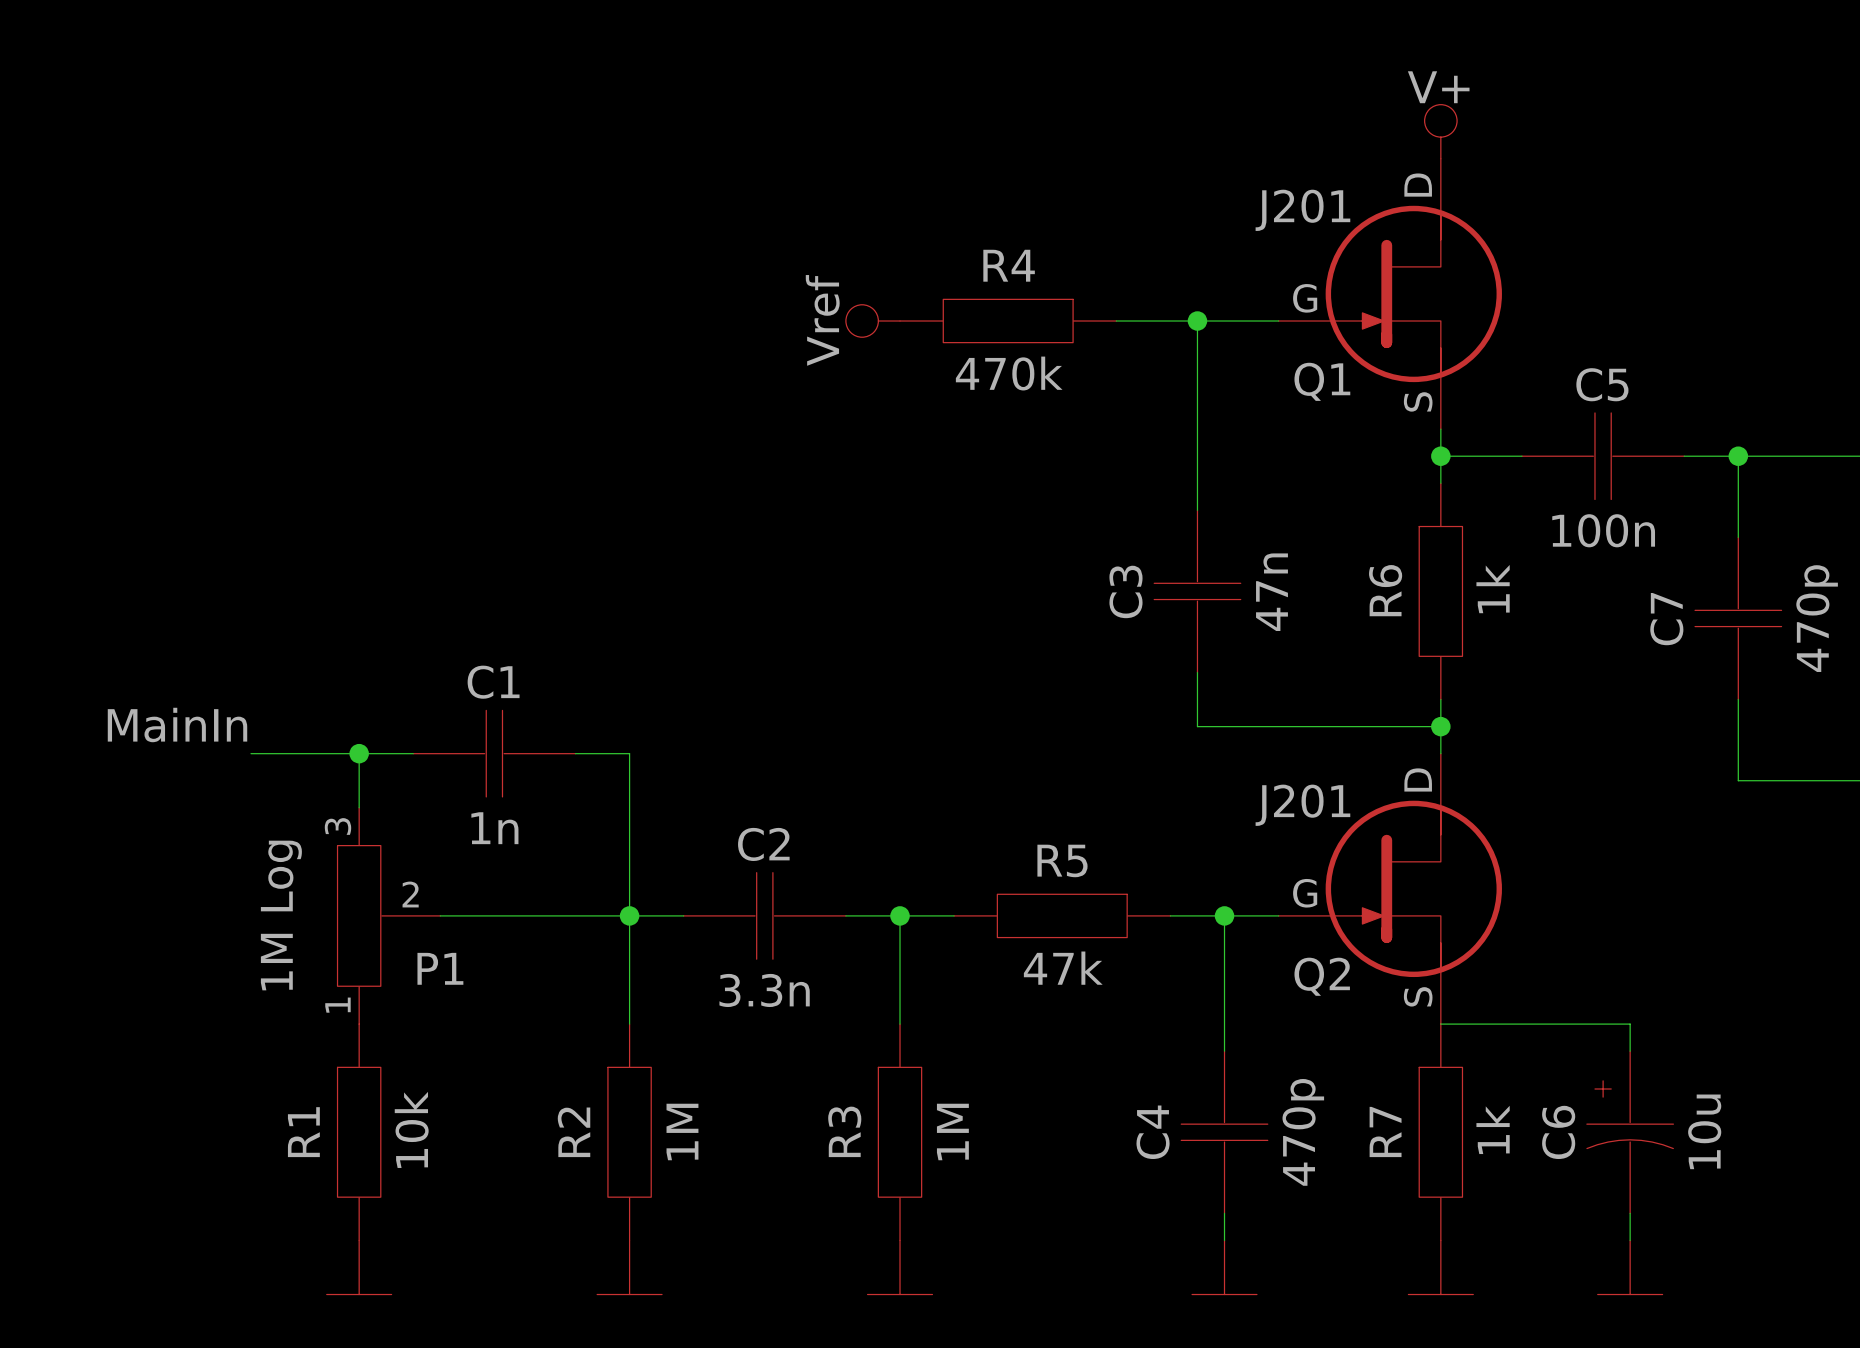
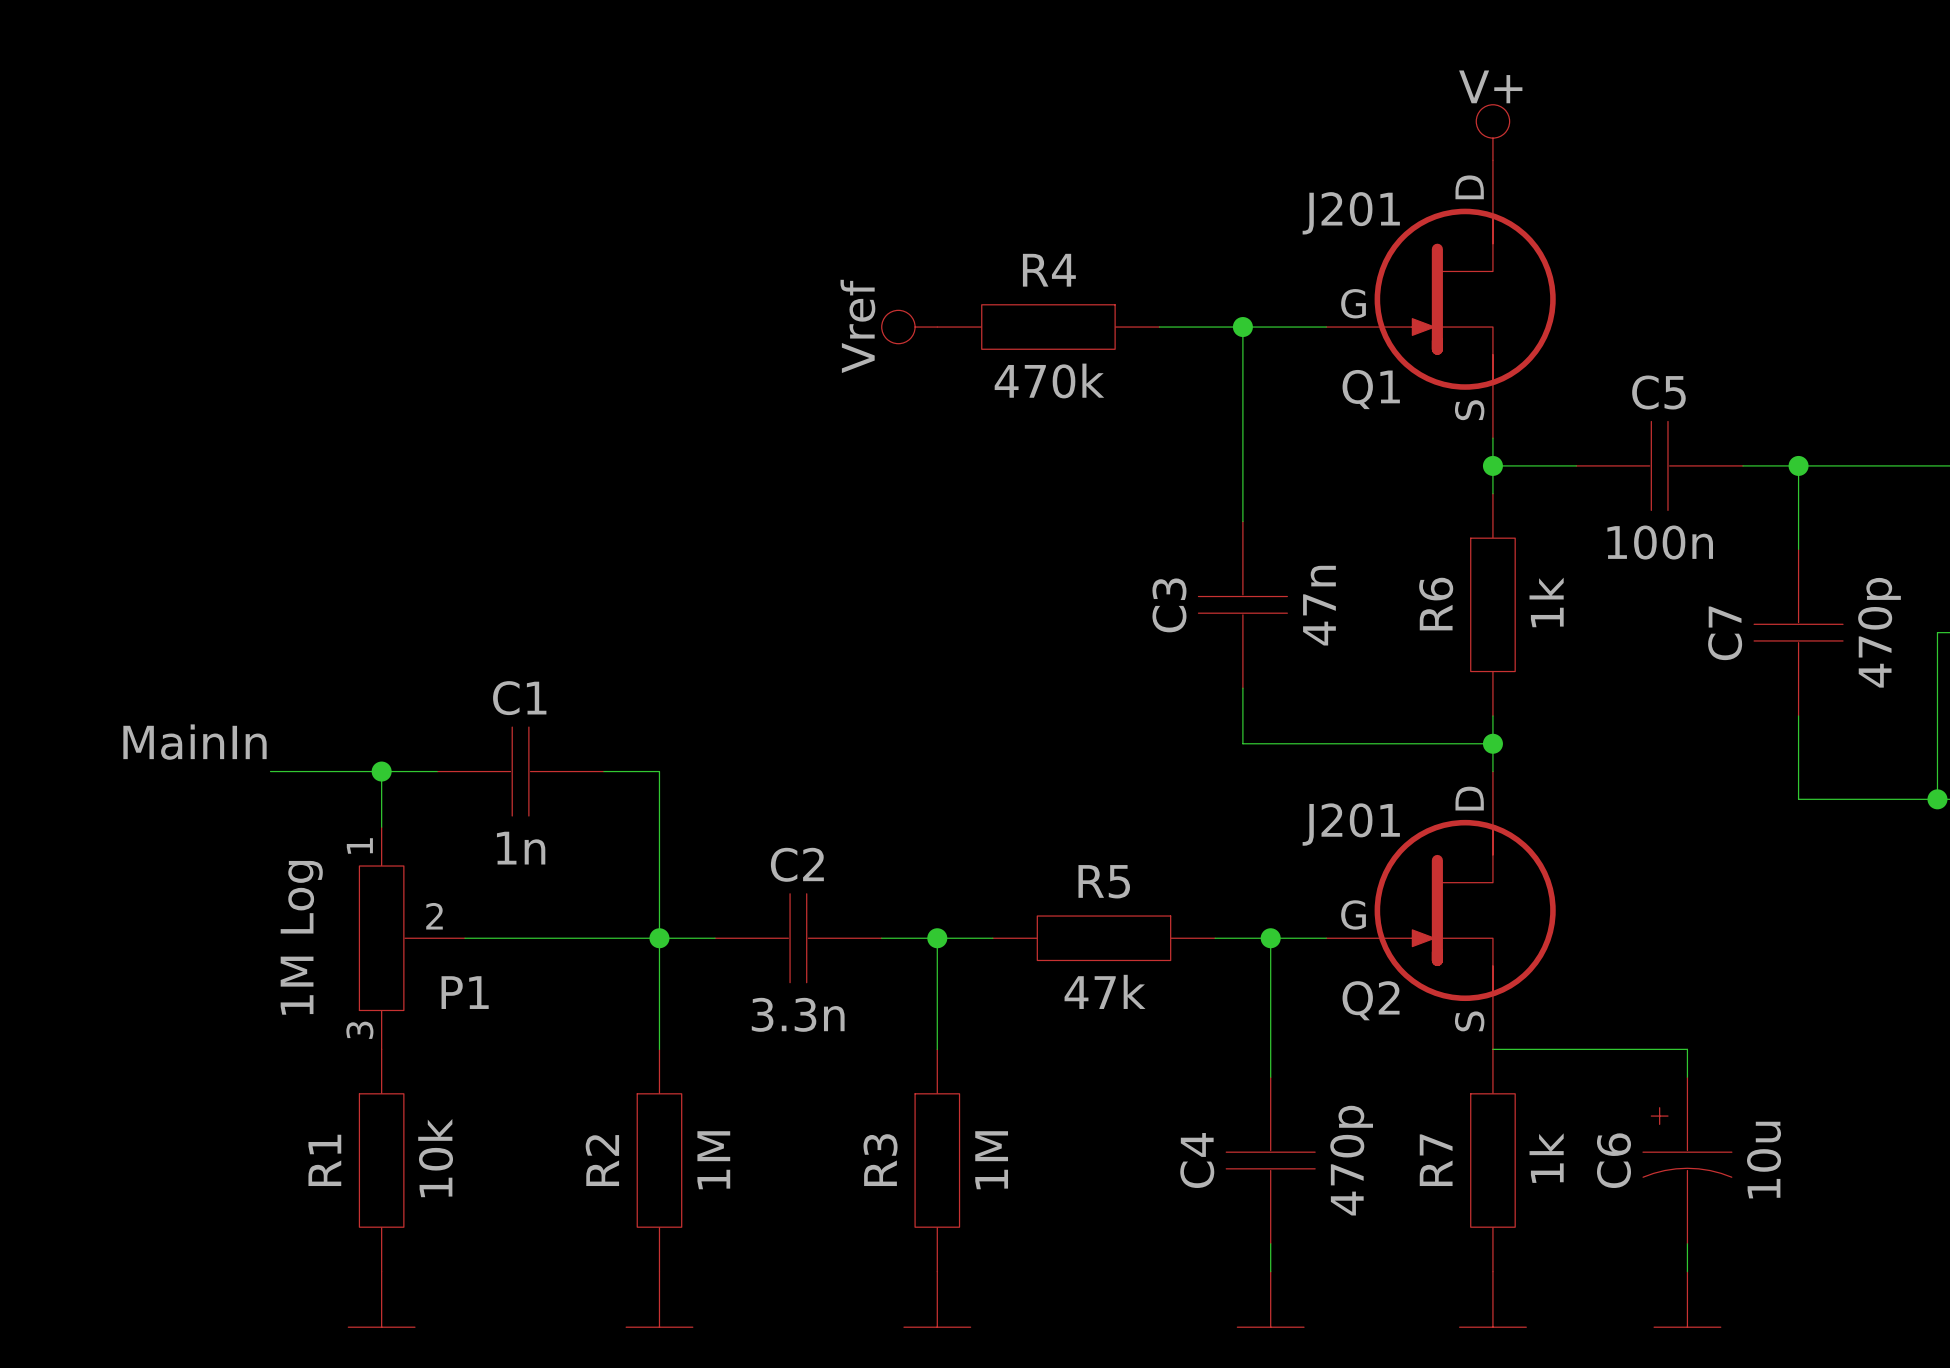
P1 flip: as is (359, 915) -> up-down (381, 938)

